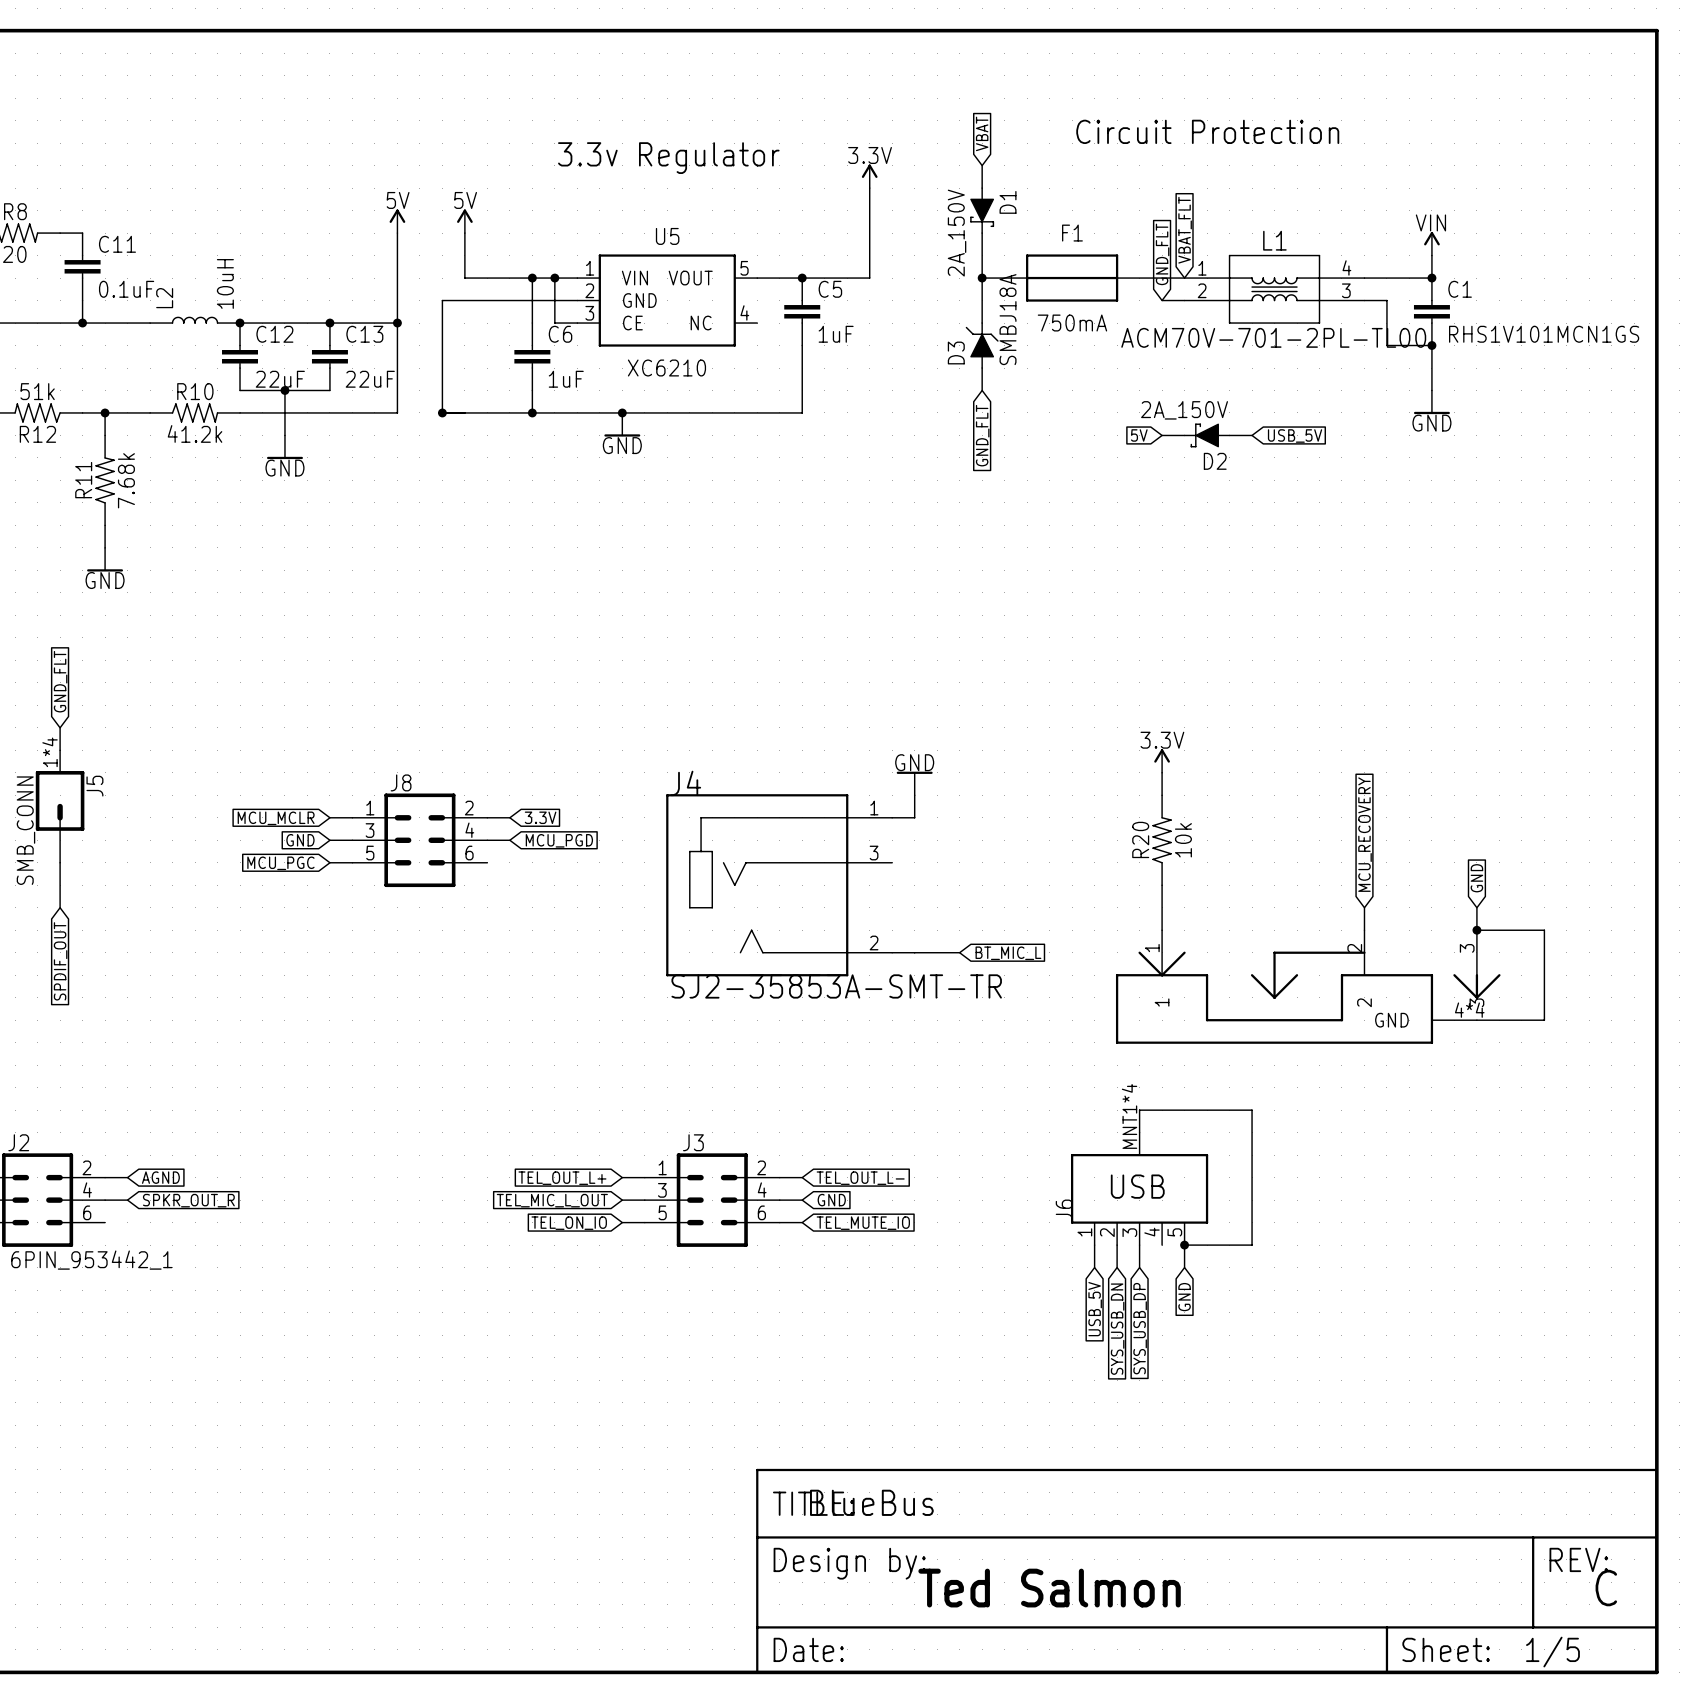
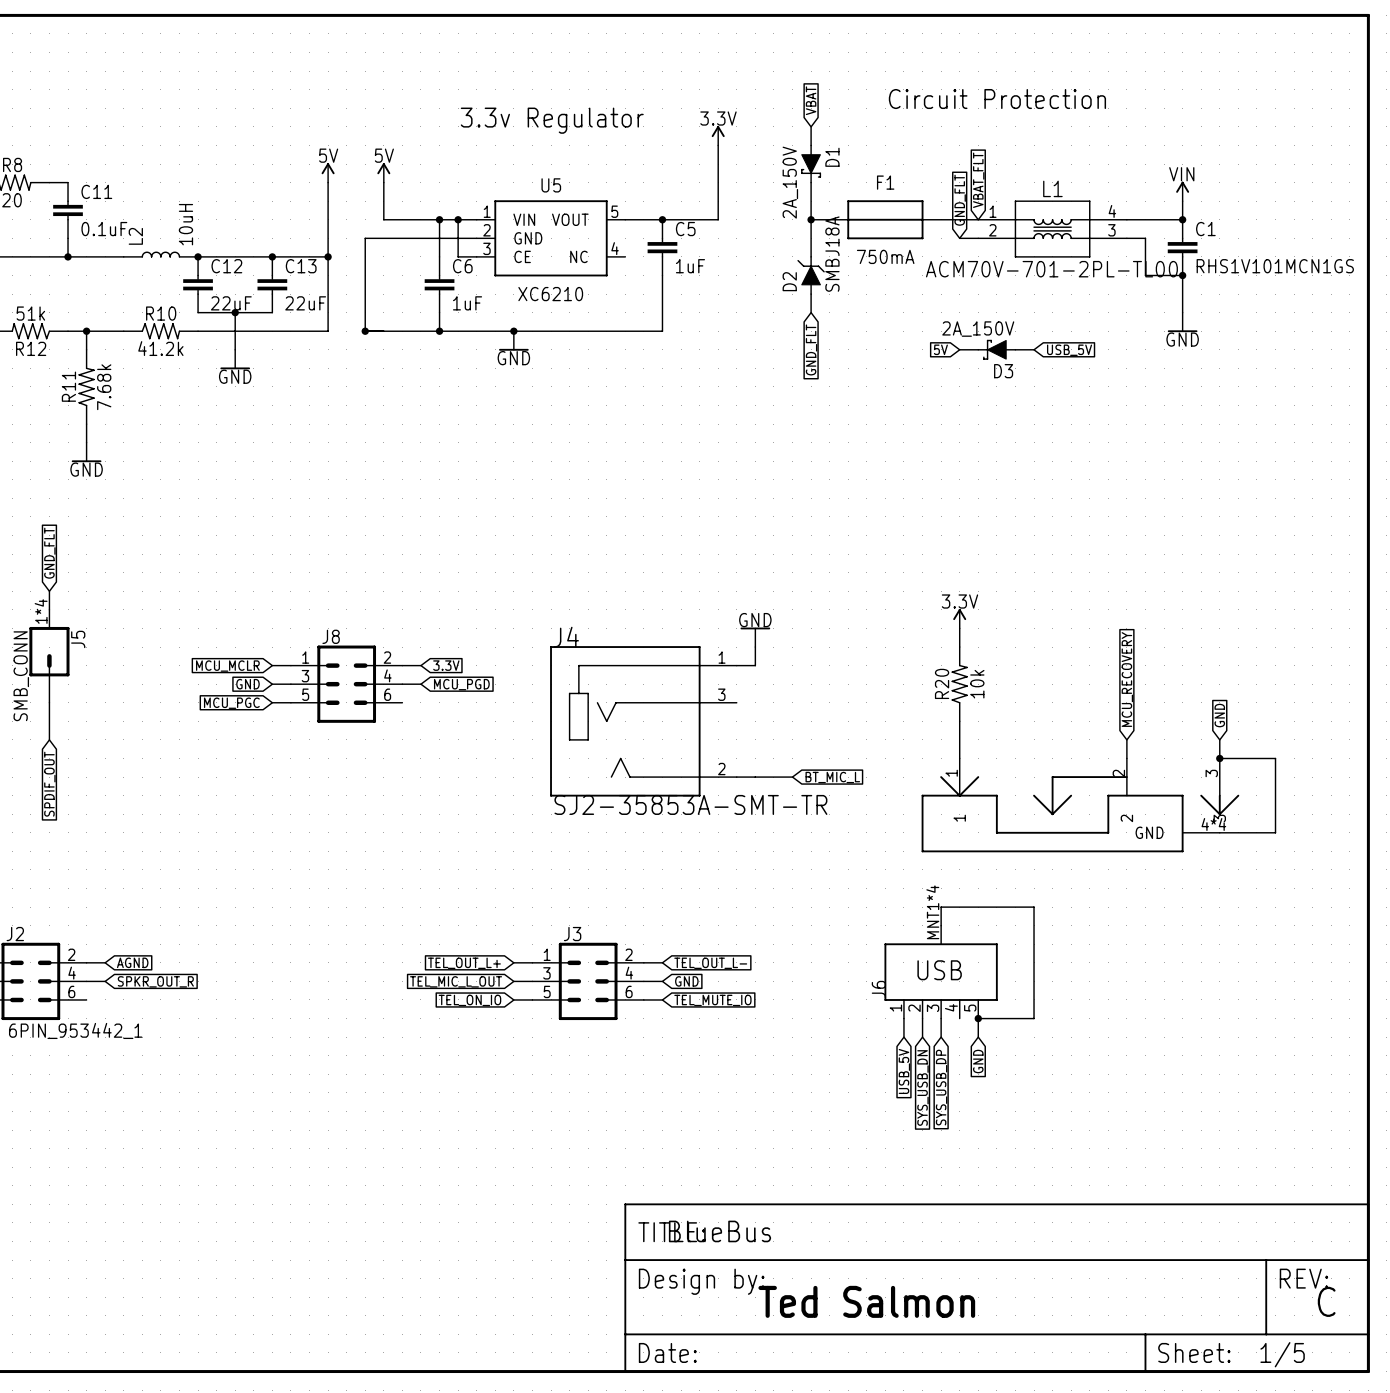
D3 name: D3 (956, 353) -> D2 (789, 281)
D2 name: D2 (1215, 461) -> D3 (1003, 371)

